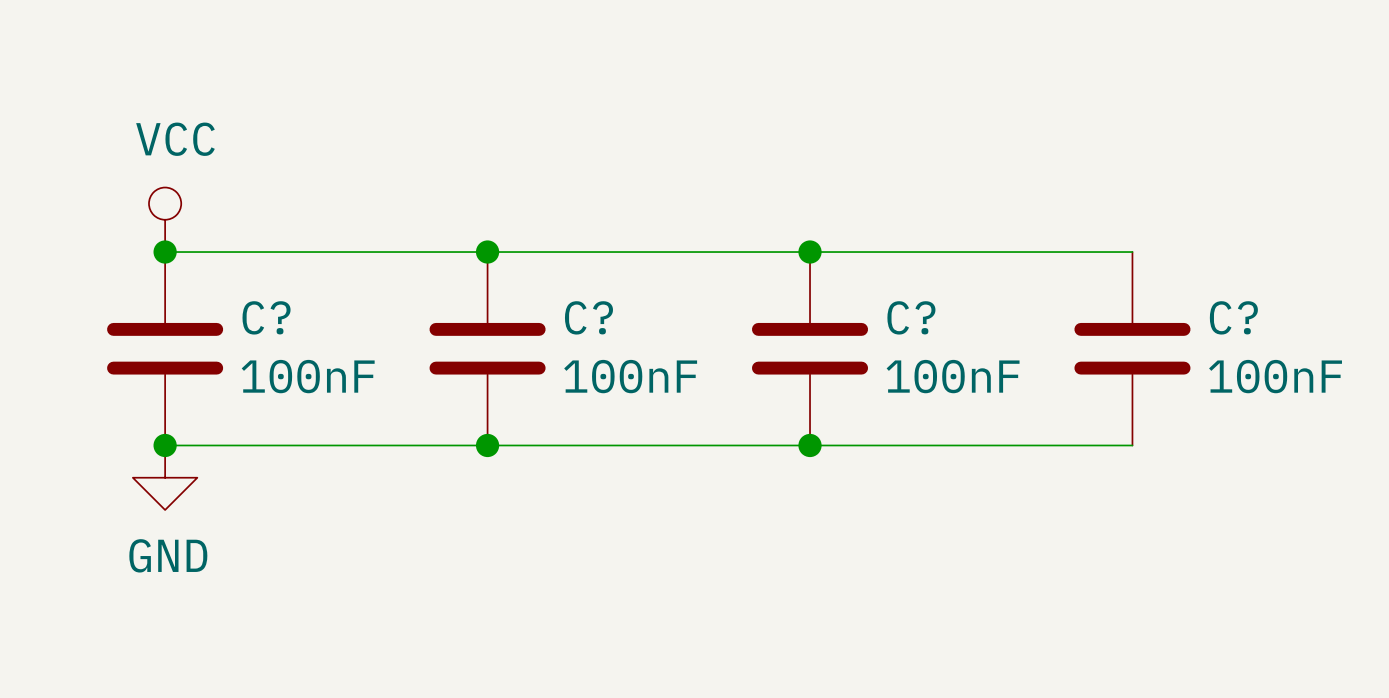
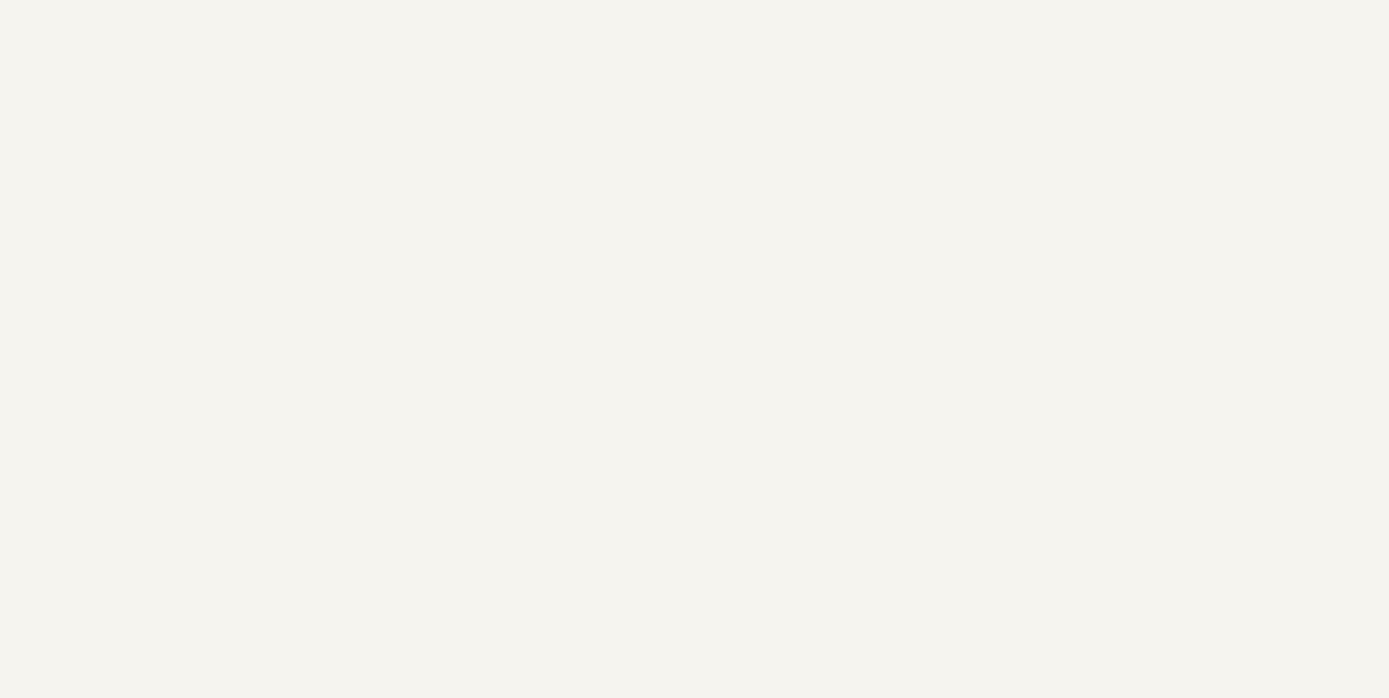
power symbol: VCC (165, 219) -> none
wire: (165, 252) (1132, 252) -> none
junction: (165, 252) -> none
junction: (487, 252) -> none
junction: (810, 252) -> none
C?: 100nF (165, 348) -> none
C?: 100nF (487, 348) -> none
C?: 100nF (810, 348) -> none
C?: 100nF (1132, 348) -> none
wire: (165, 445) (1132, 445) -> none
junction: (165, 445) -> none
junction: (487, 445) -> none
junction: (810, 445) -> none
power symbol: GND (165, 477) -> none

